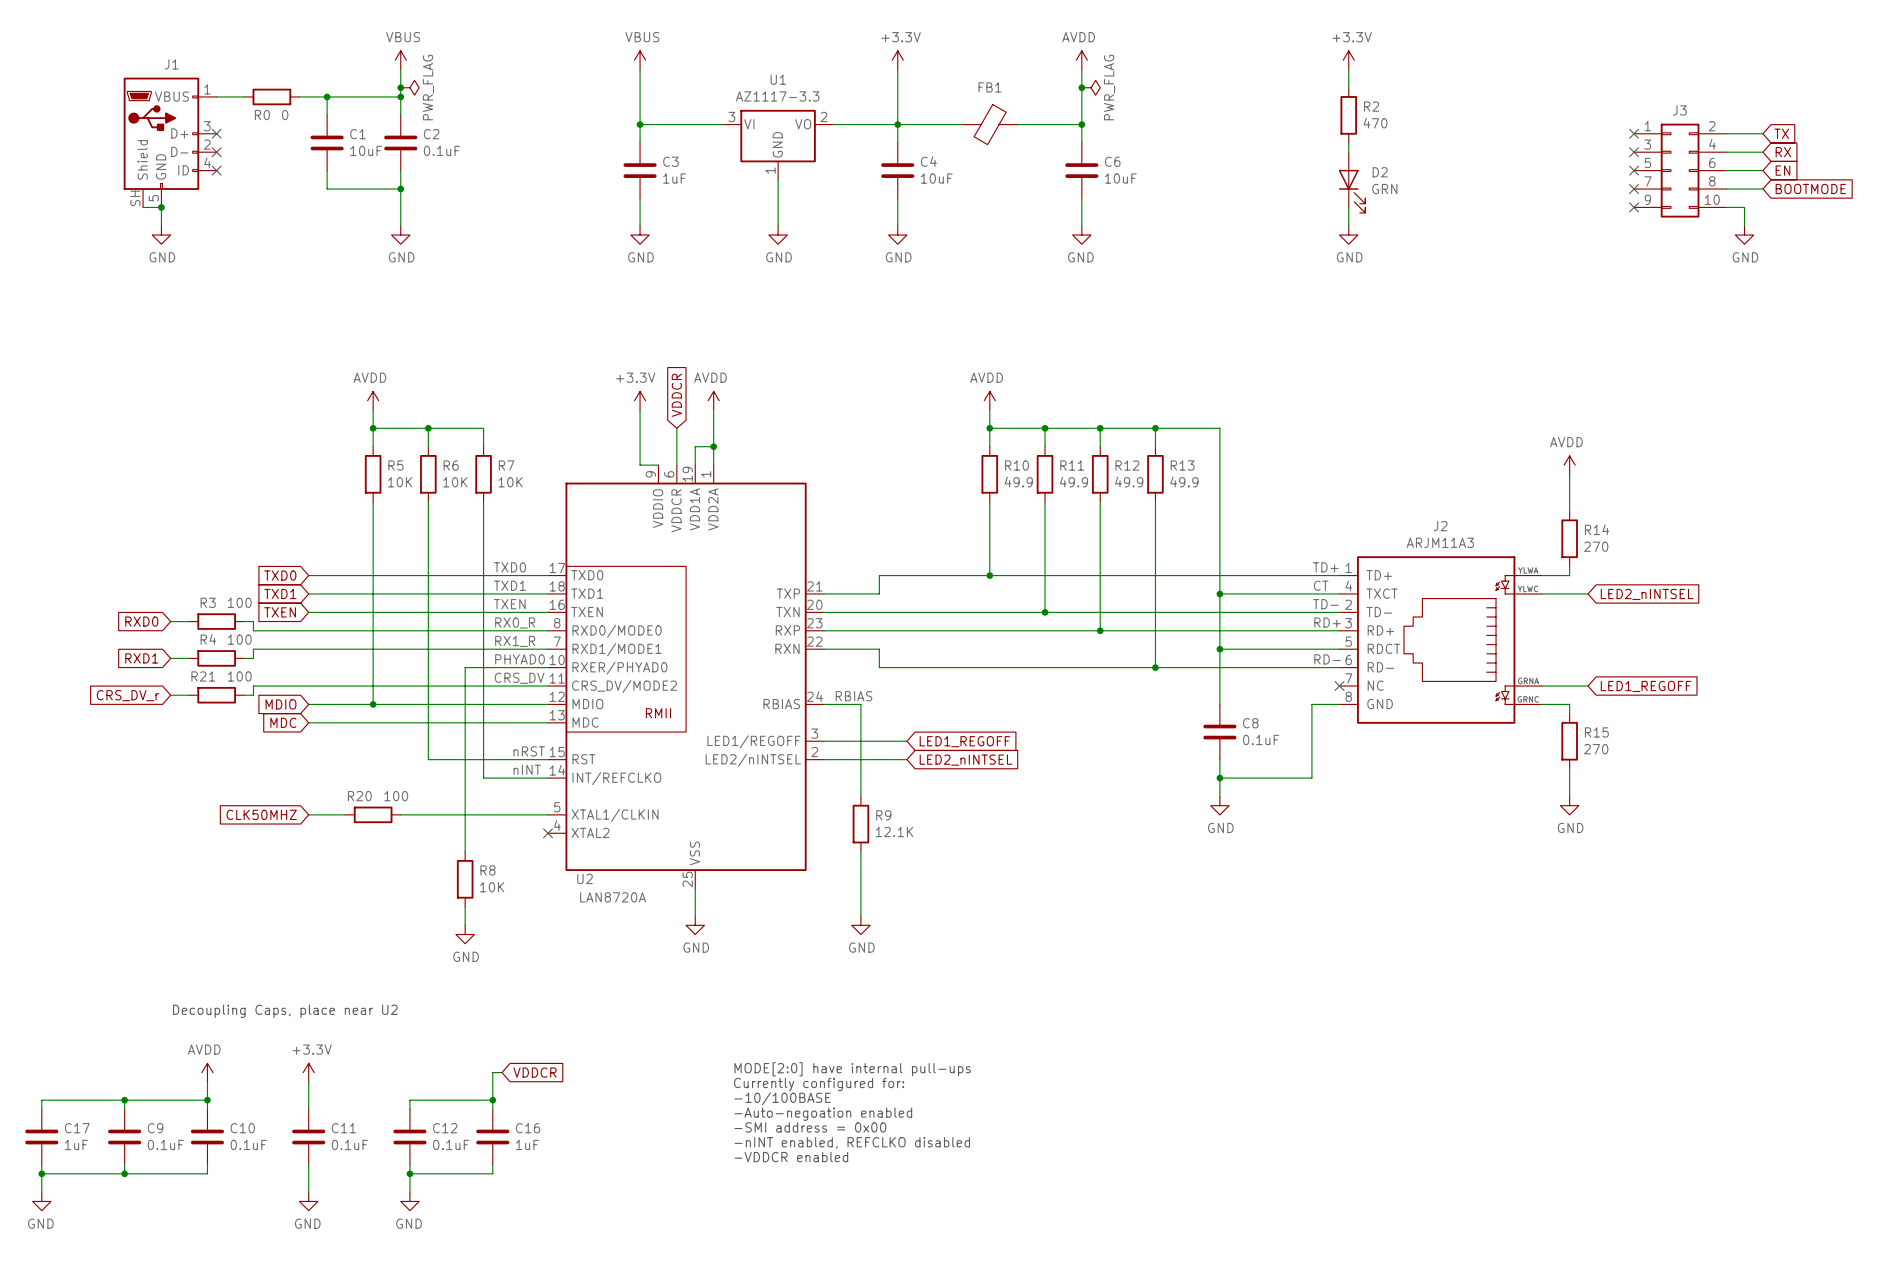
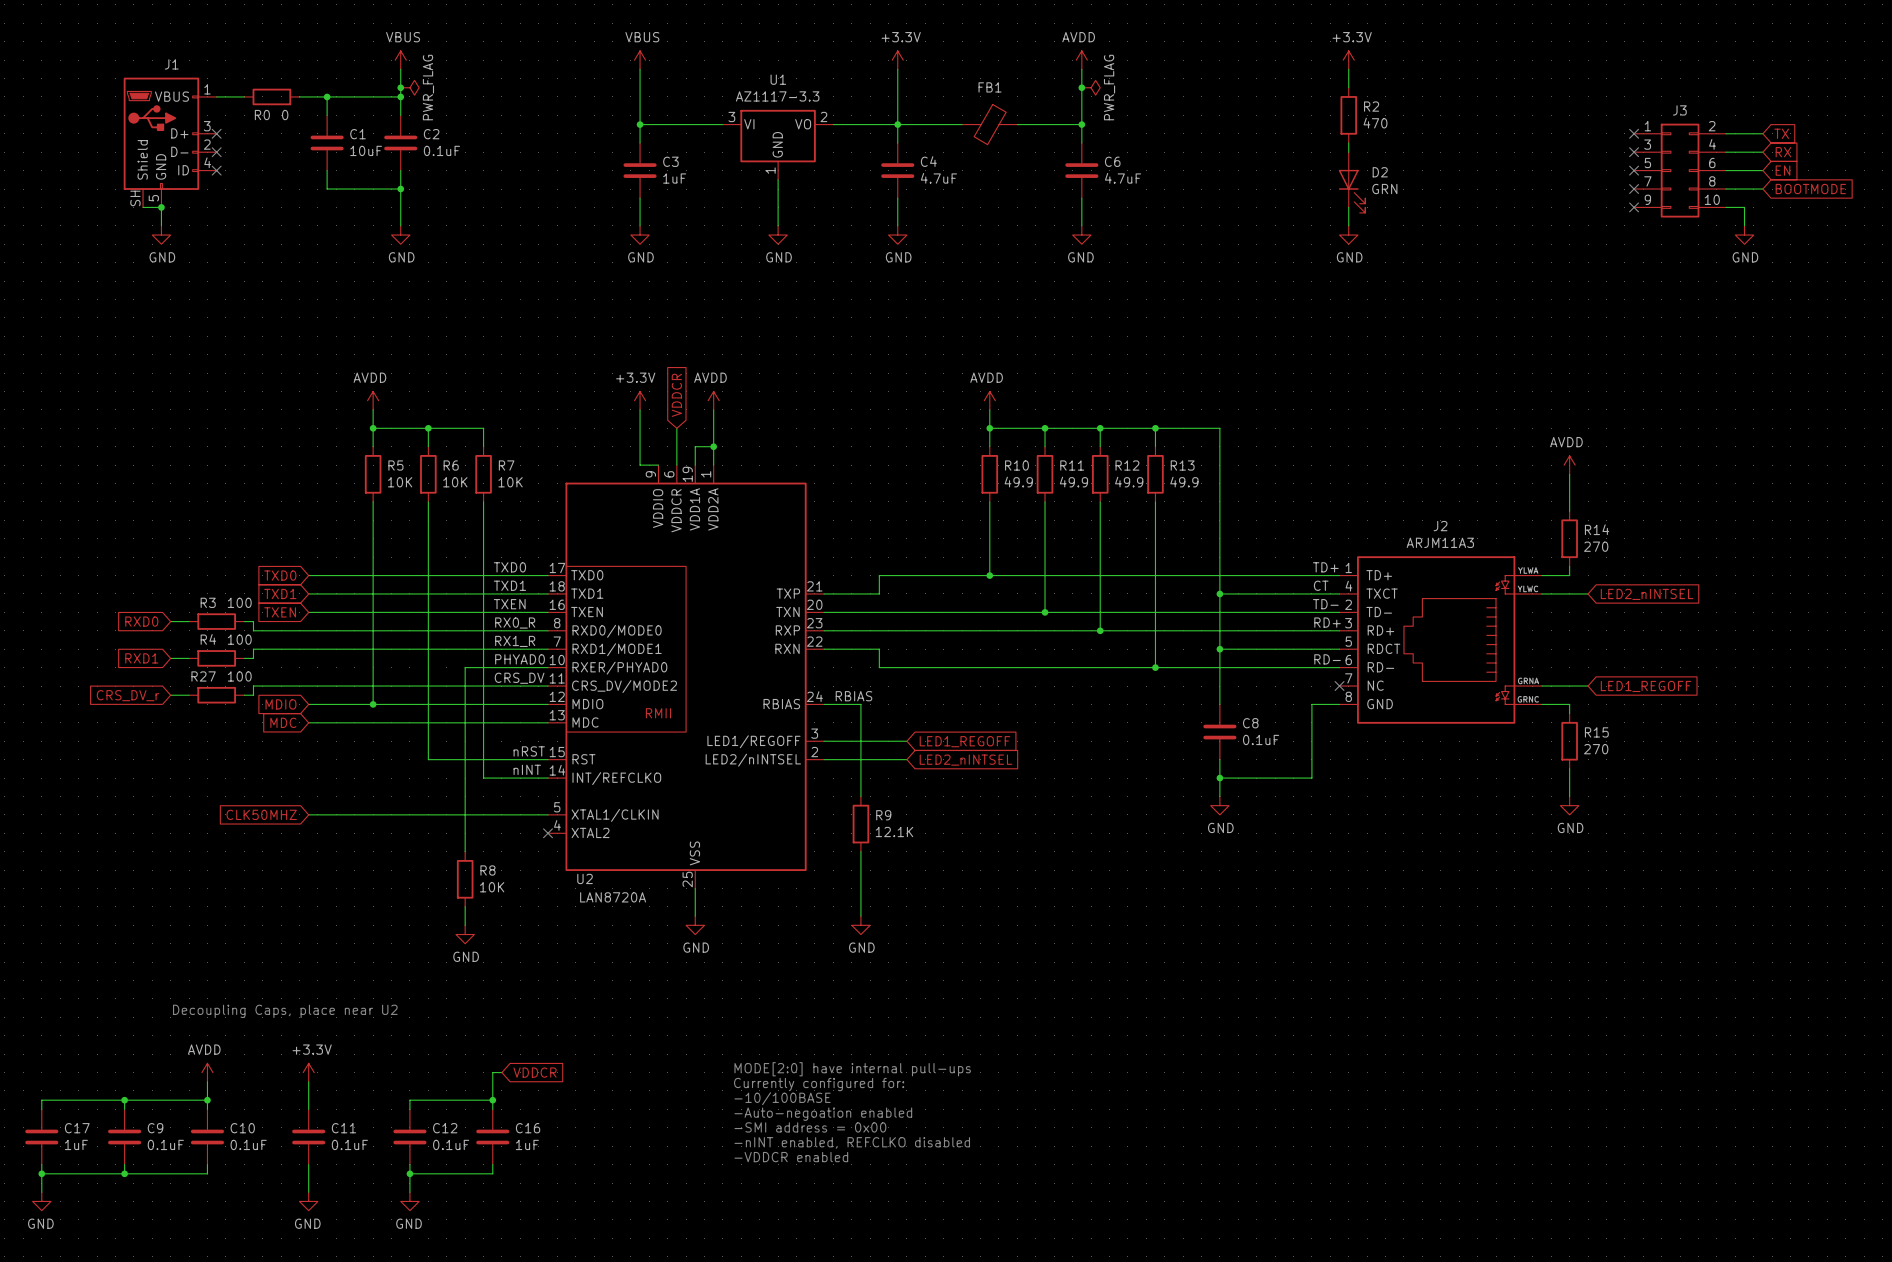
C4 value: 10uF (936, 178) -> 4.7uF (938, 178)
C6 value: 10uF (1120, 178) -> 4.7uF (1123, 178)
R21 name: R21 (203, 676) -> R27 (203, 676)
wire: none -> (345, 814) (400, 814)
R20: 100 (373, 814) -> none

